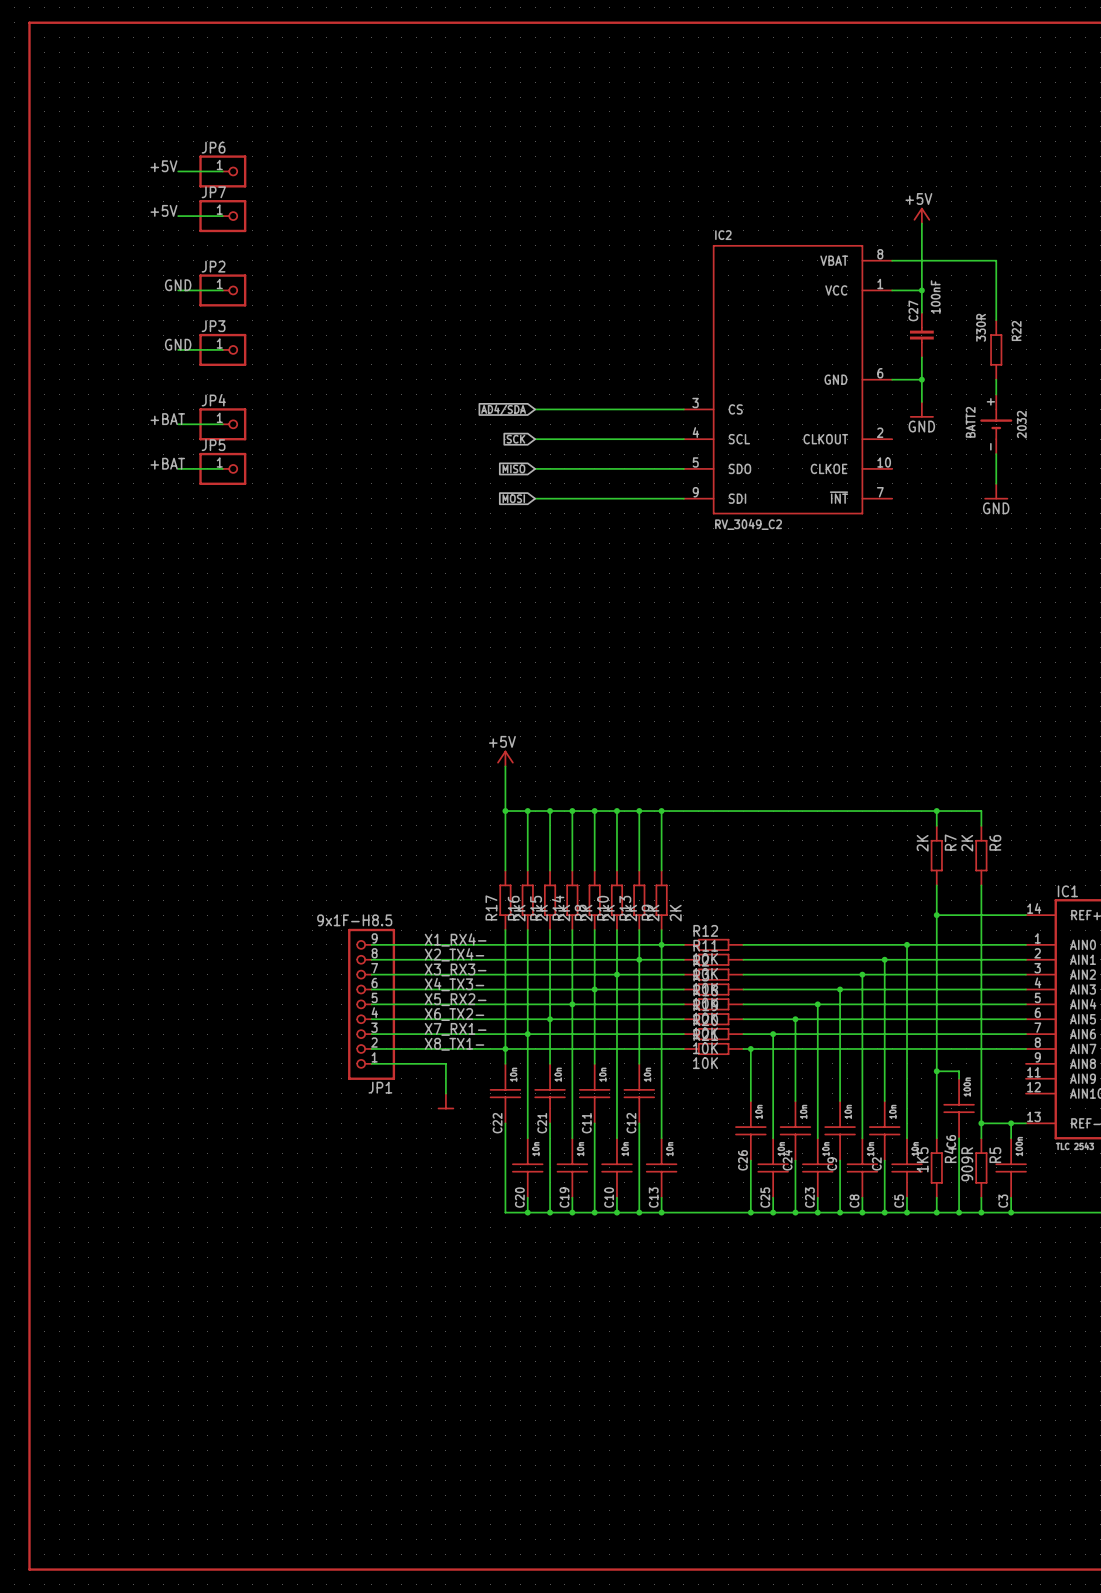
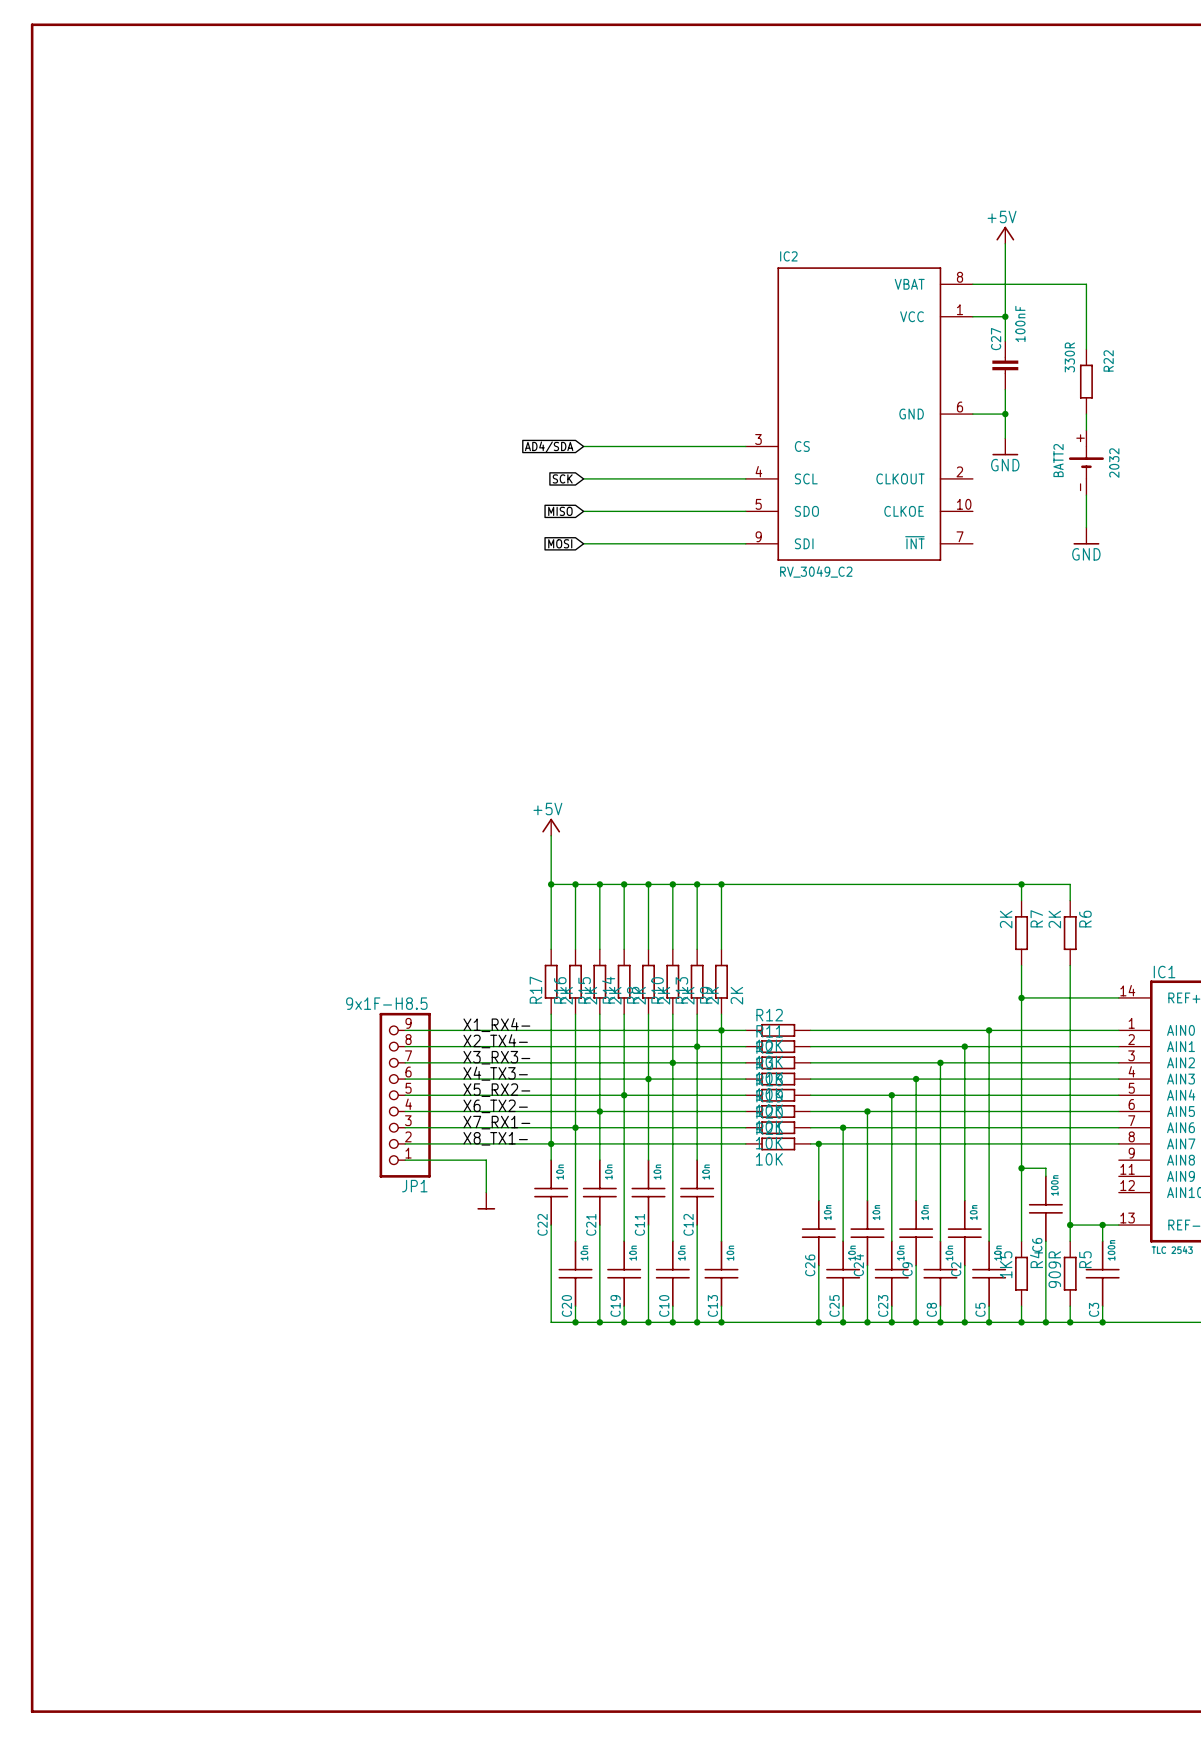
label: +5V (163, 166) -> none
wire: (178, 171) (222, 171) -> none
JP6: (222, 171) -> none
label: +5V (163, 210) -> none
wire: (178, 216) (222, 216) -> none
JP7: (222, 216) -> none
label: GND (178, 285) -> none
wire: (178, 290) (222, 290) -> none
JP2: (222, 290) -> none
label: GND (178, 344) -> none
wire: (178, 349) (222, 349) -> none
JP3: (222, 349) -> none
label: +BAT (167, 419) -> none
wire: (178, 424) (222, 424) -> none
JP4: (222, 424) -> none
label: +BAT (167, 463) -> none
wire: (178, 468) (222, 468) -> none
JP5: (222, 468) -> none

